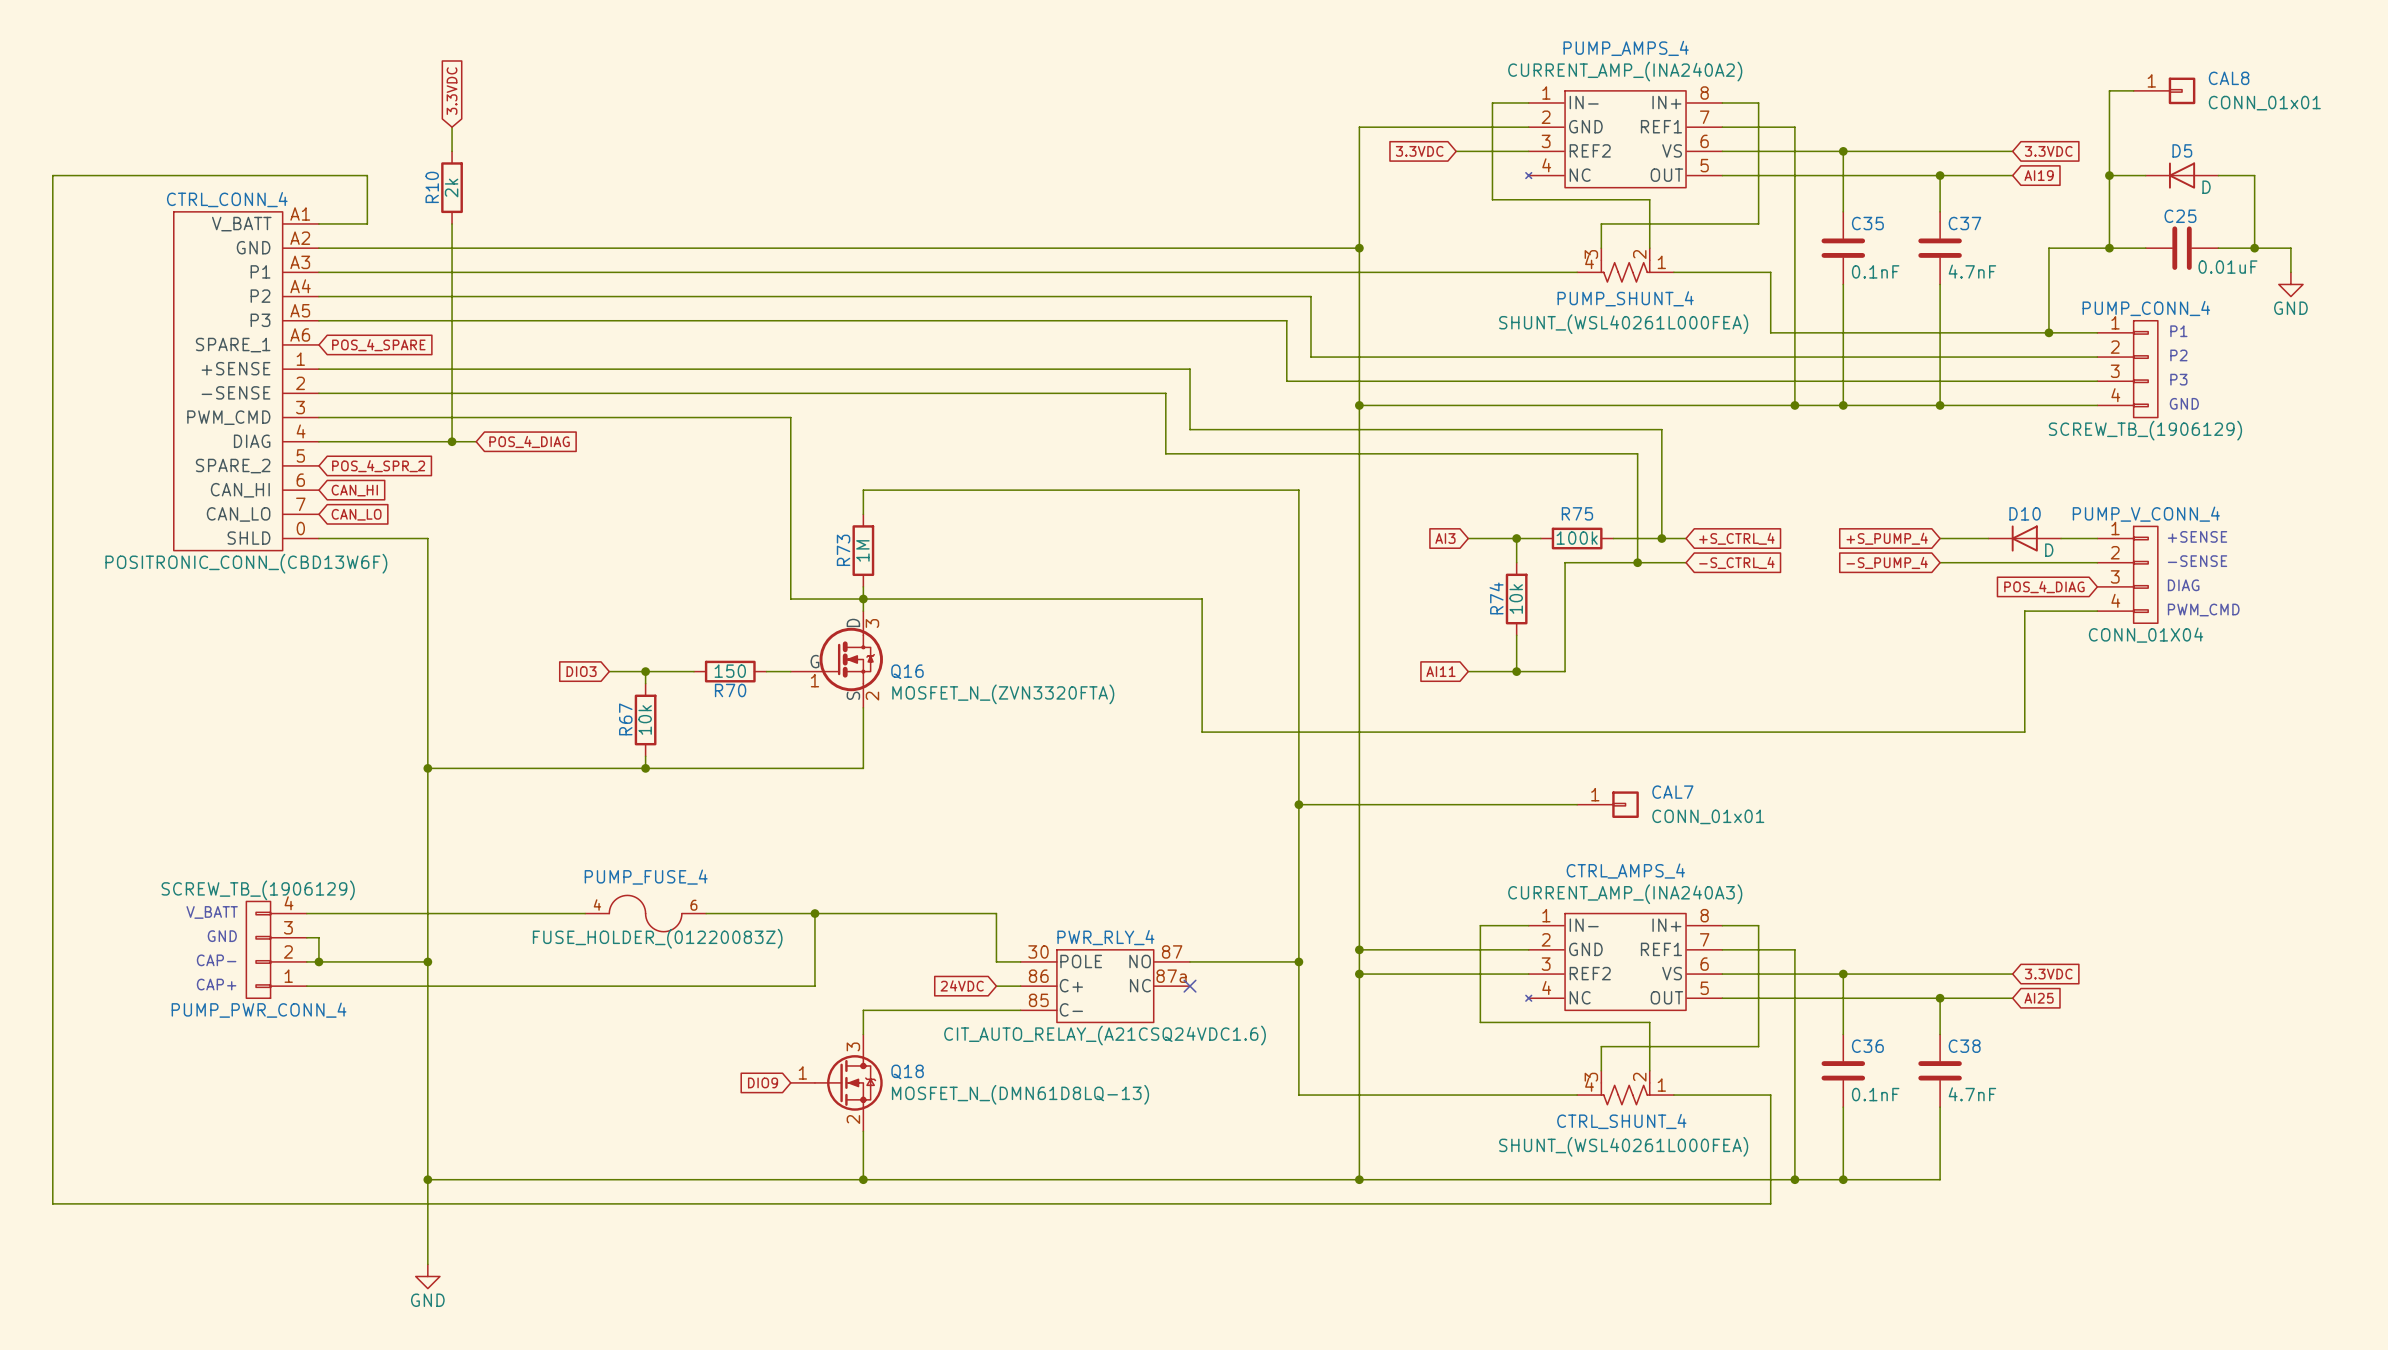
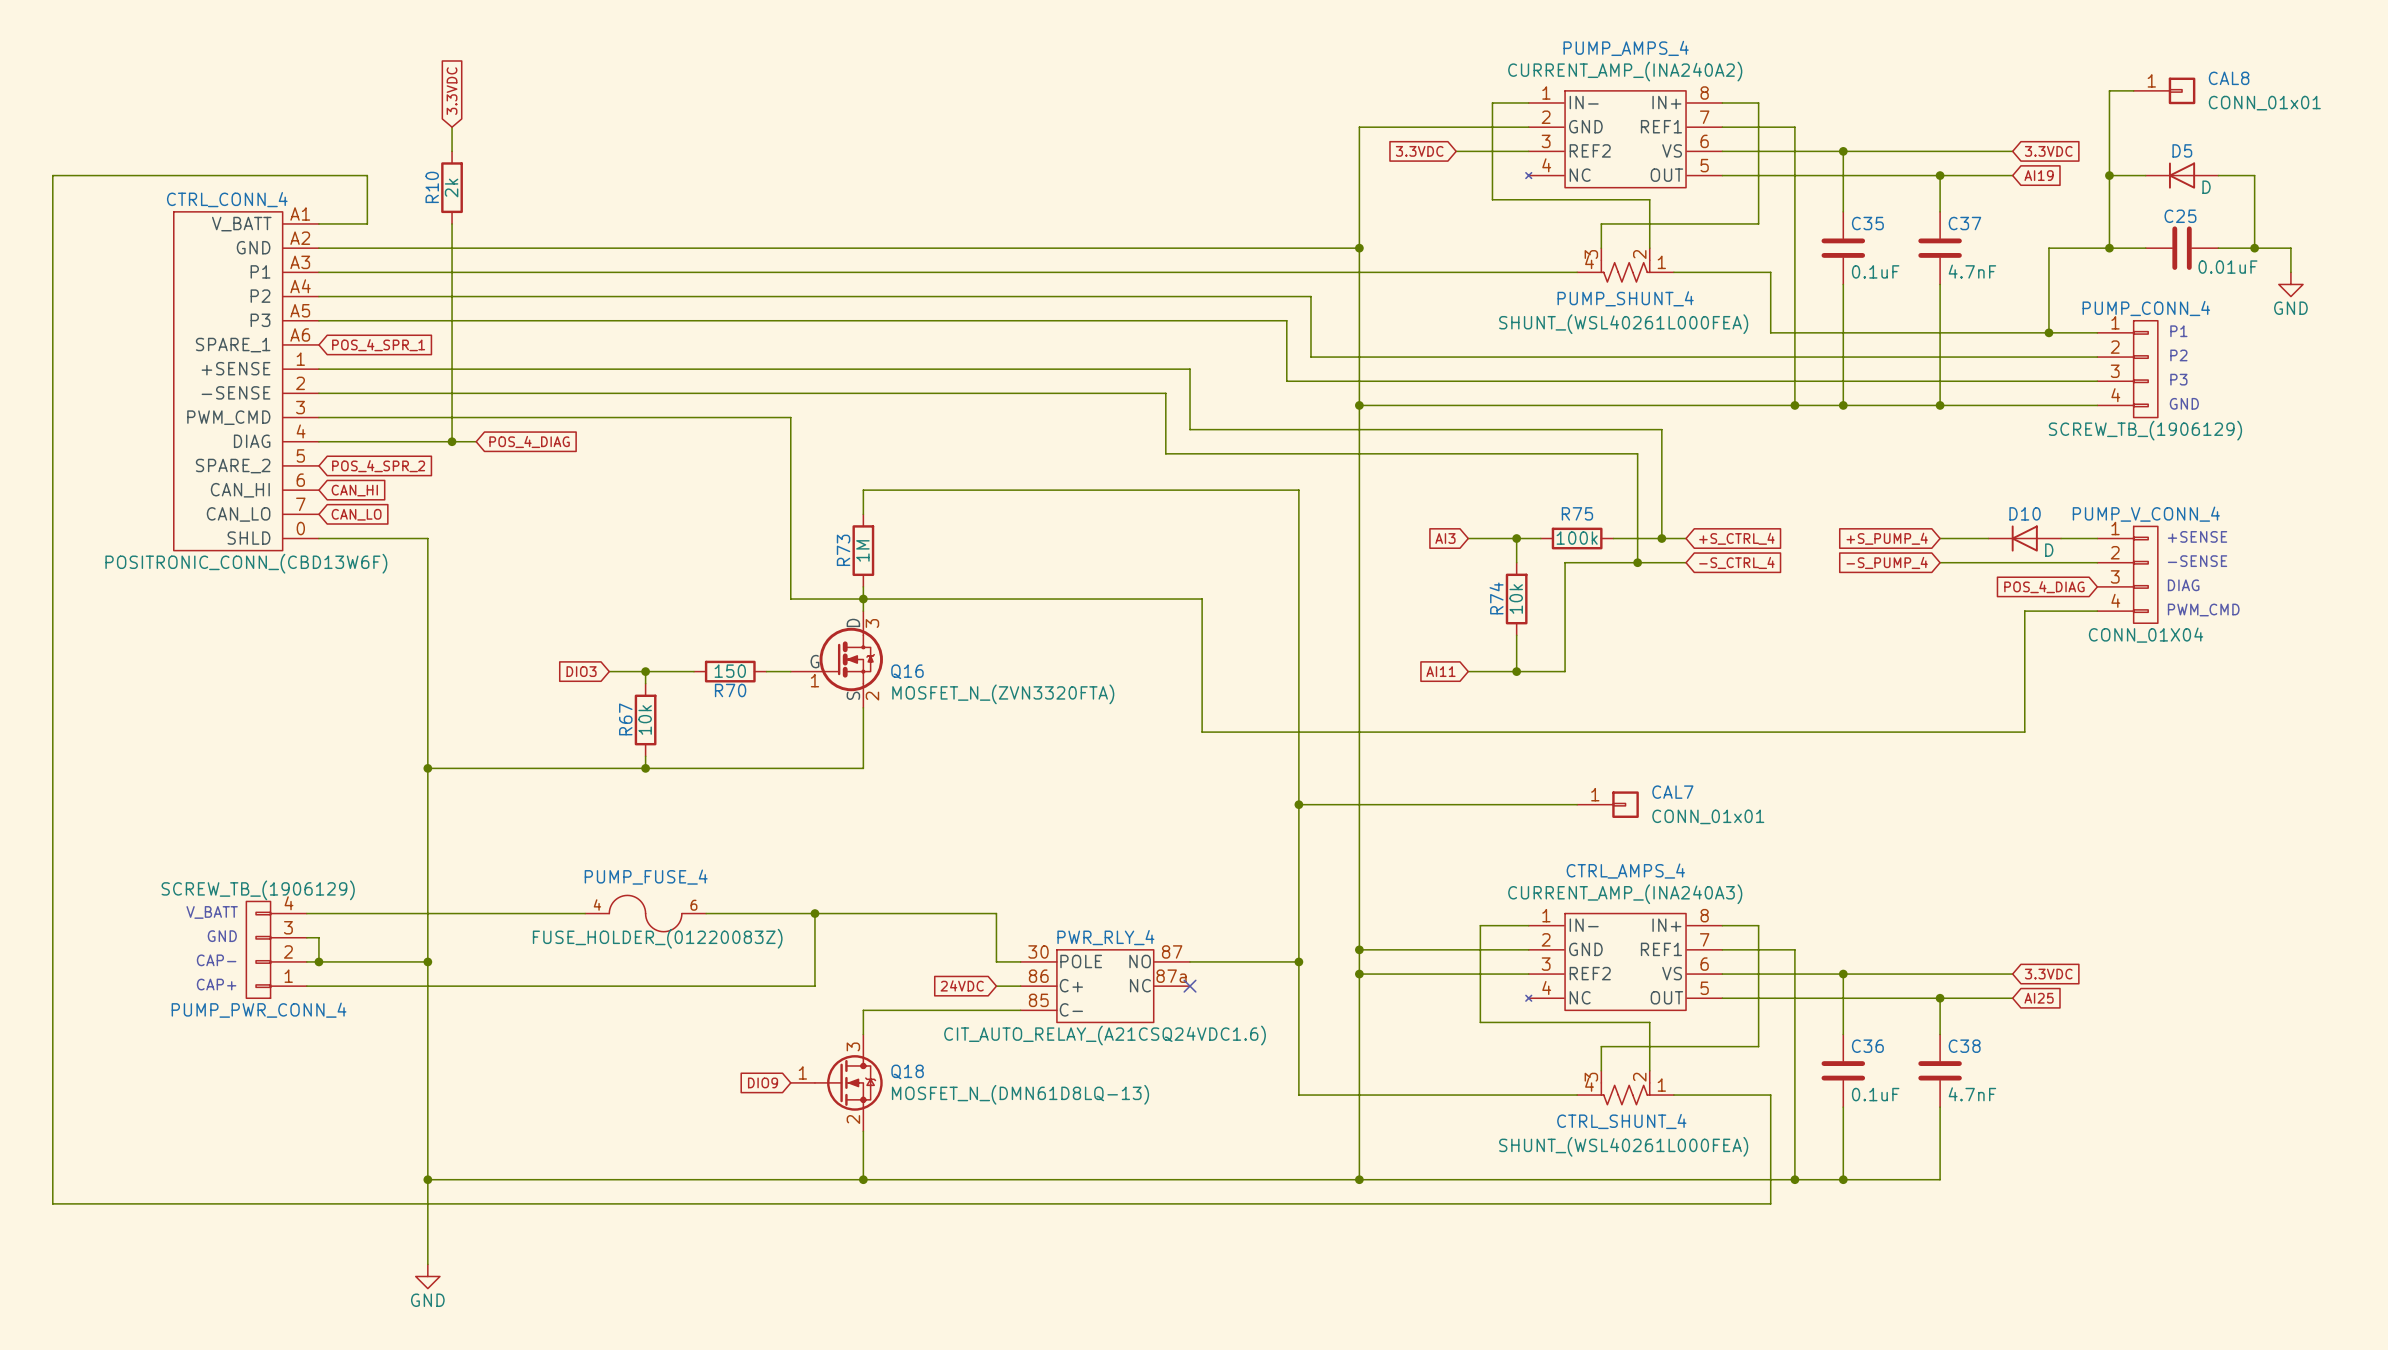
C35 value: 0.1nF (1875, 271) -> 0.1uF (1875, 271)
global label: POS_4_SPARE (378, 345) -> POS_4_SPR_1 (378, 345)
C36 value: 0.1nF (1875, 1094) -> 0.1uF (1875, 1094)

